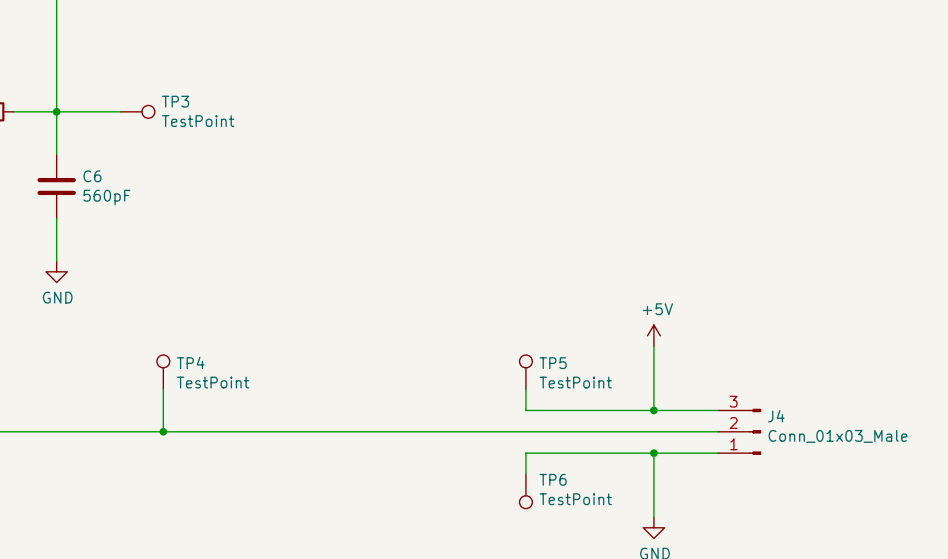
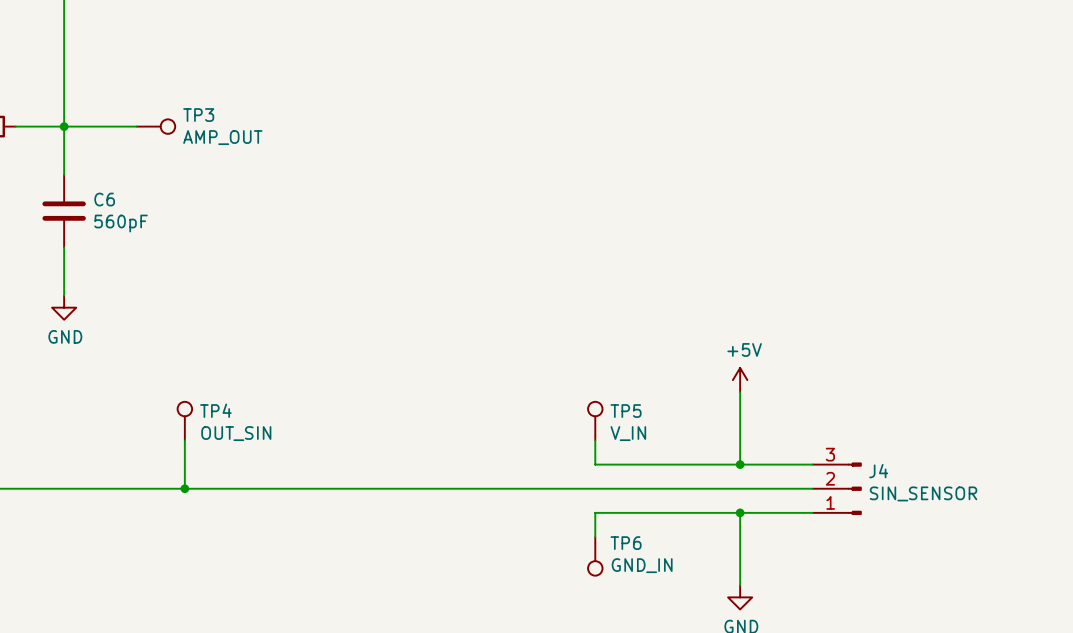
TP3 value: TestPoint (198, 121) -> AMP_OUT (222, 137)
TP4 value: TestPoint (213, 382) -> OUT_SIN (236, 433)
TP5 value: TestPoint (575, 382) -> V_IN (628, 433)
J4 value: Conn_01x03_Male (838, 436) -> SIN_SENSOR (923, 493)
TP6 value: TestPoint (575, 499) -> GND_IN (642, 565)

